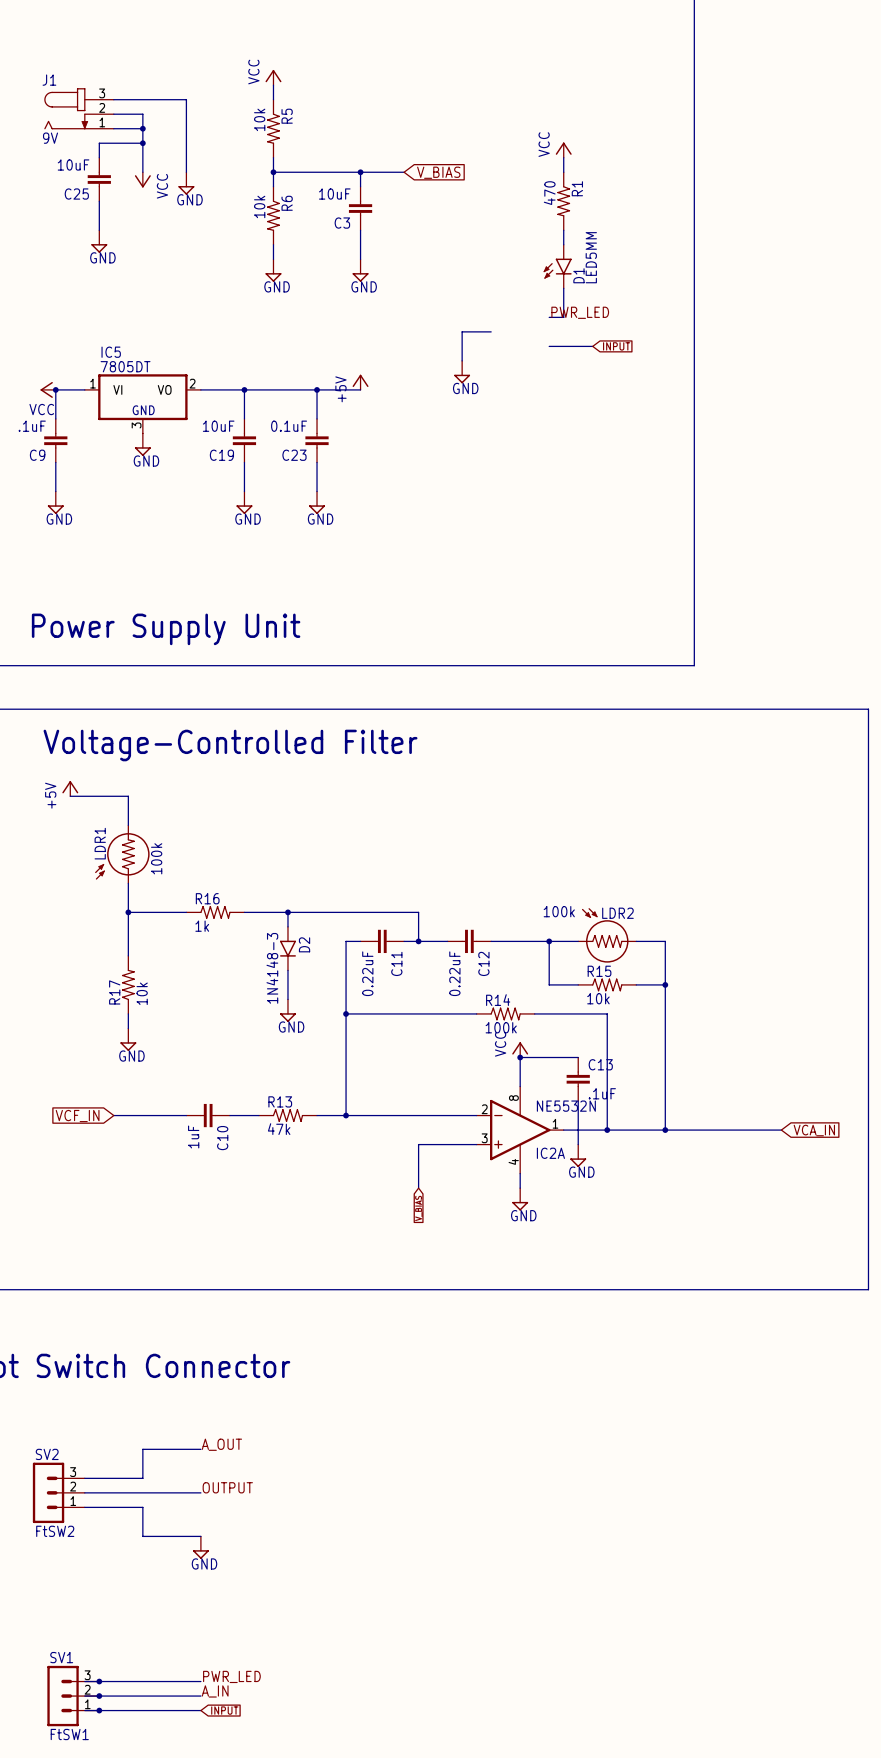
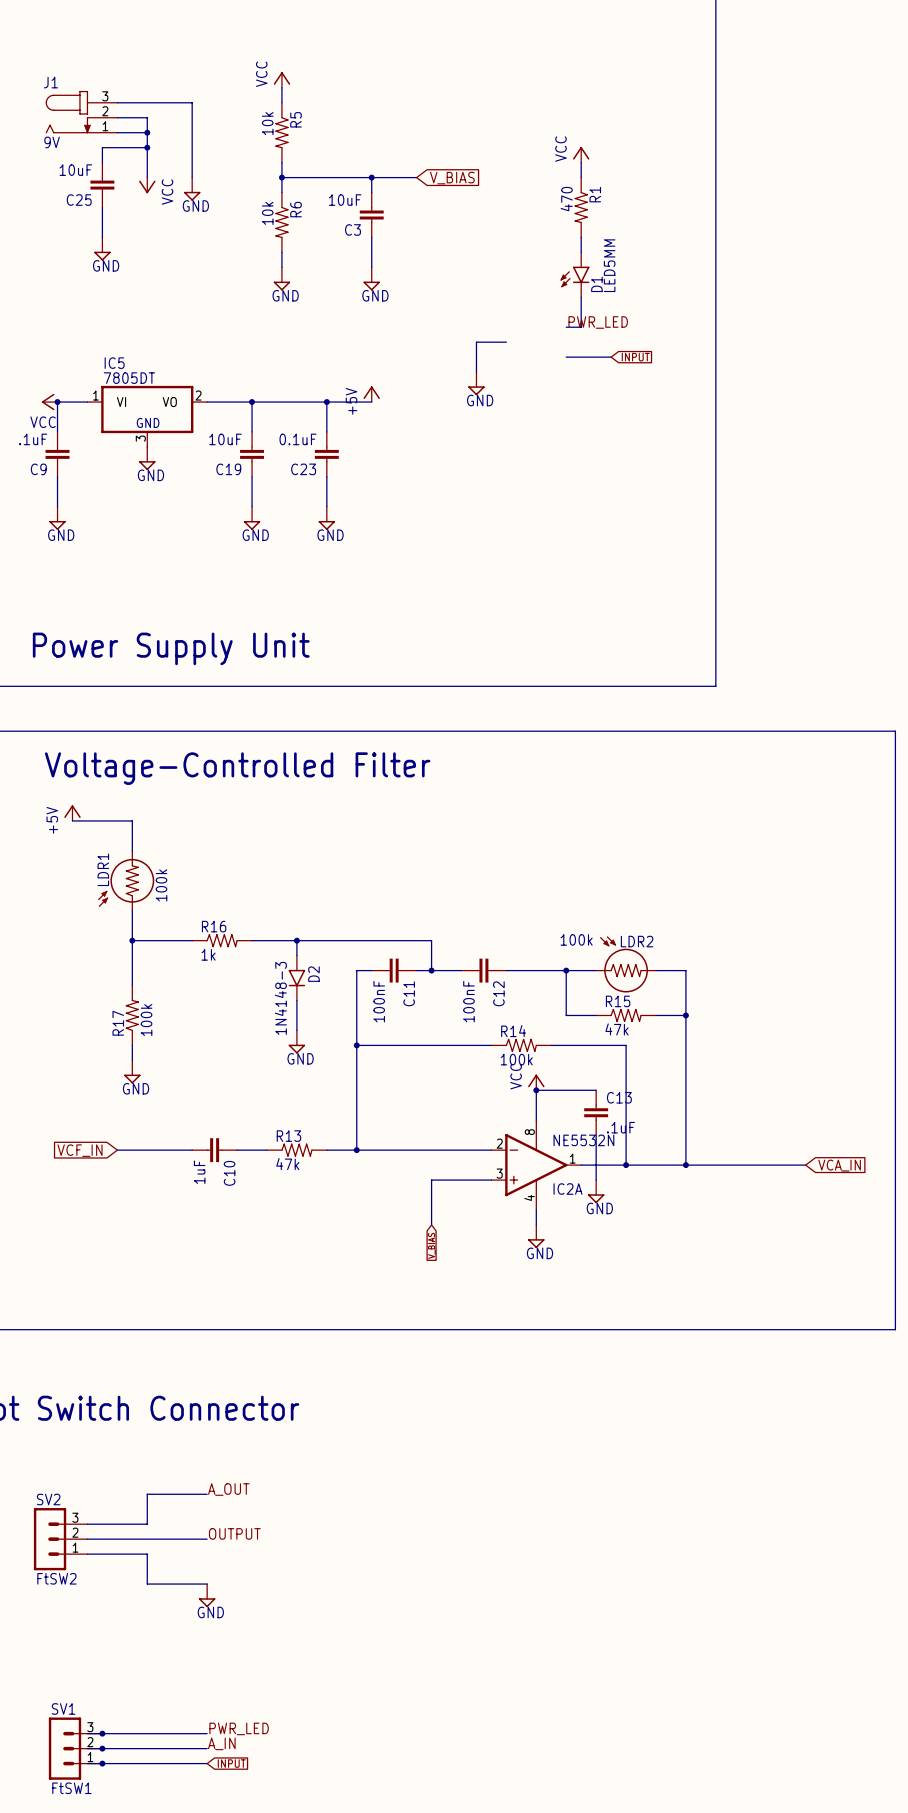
C11 value: 0.22uF (367, 973) -> 100nF (379, 1001)
C12 value: 0.22uF (454, 973) -> 100nF (468, 1001)
R17 value: 10k (142, 993) -> 100k (146, 1020)
R15 value: 10k (598, 998) -> 47k (616, 1029)

